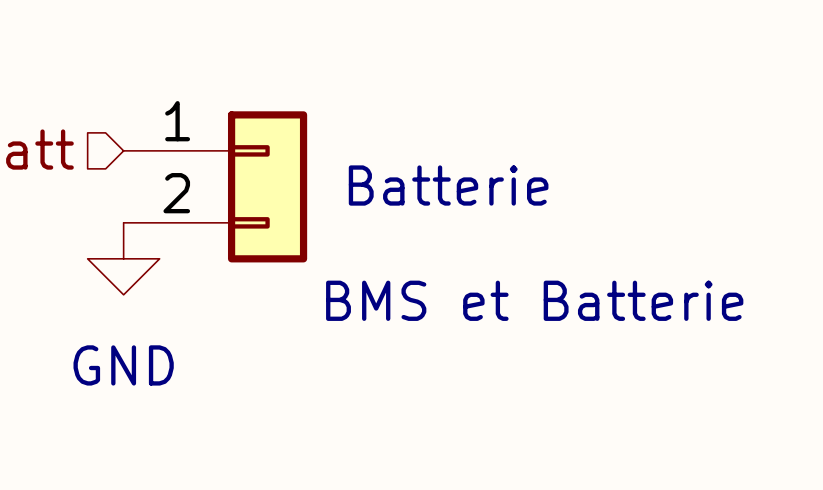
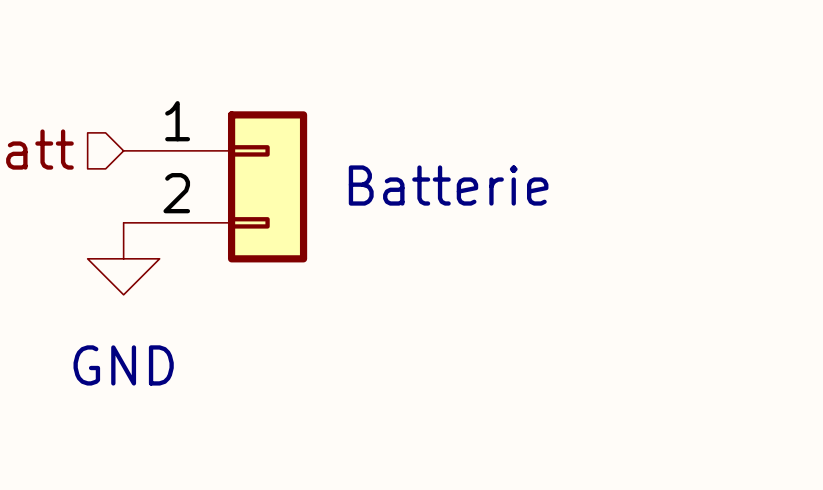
text: BMS et Batterie (534, 300) -> none

